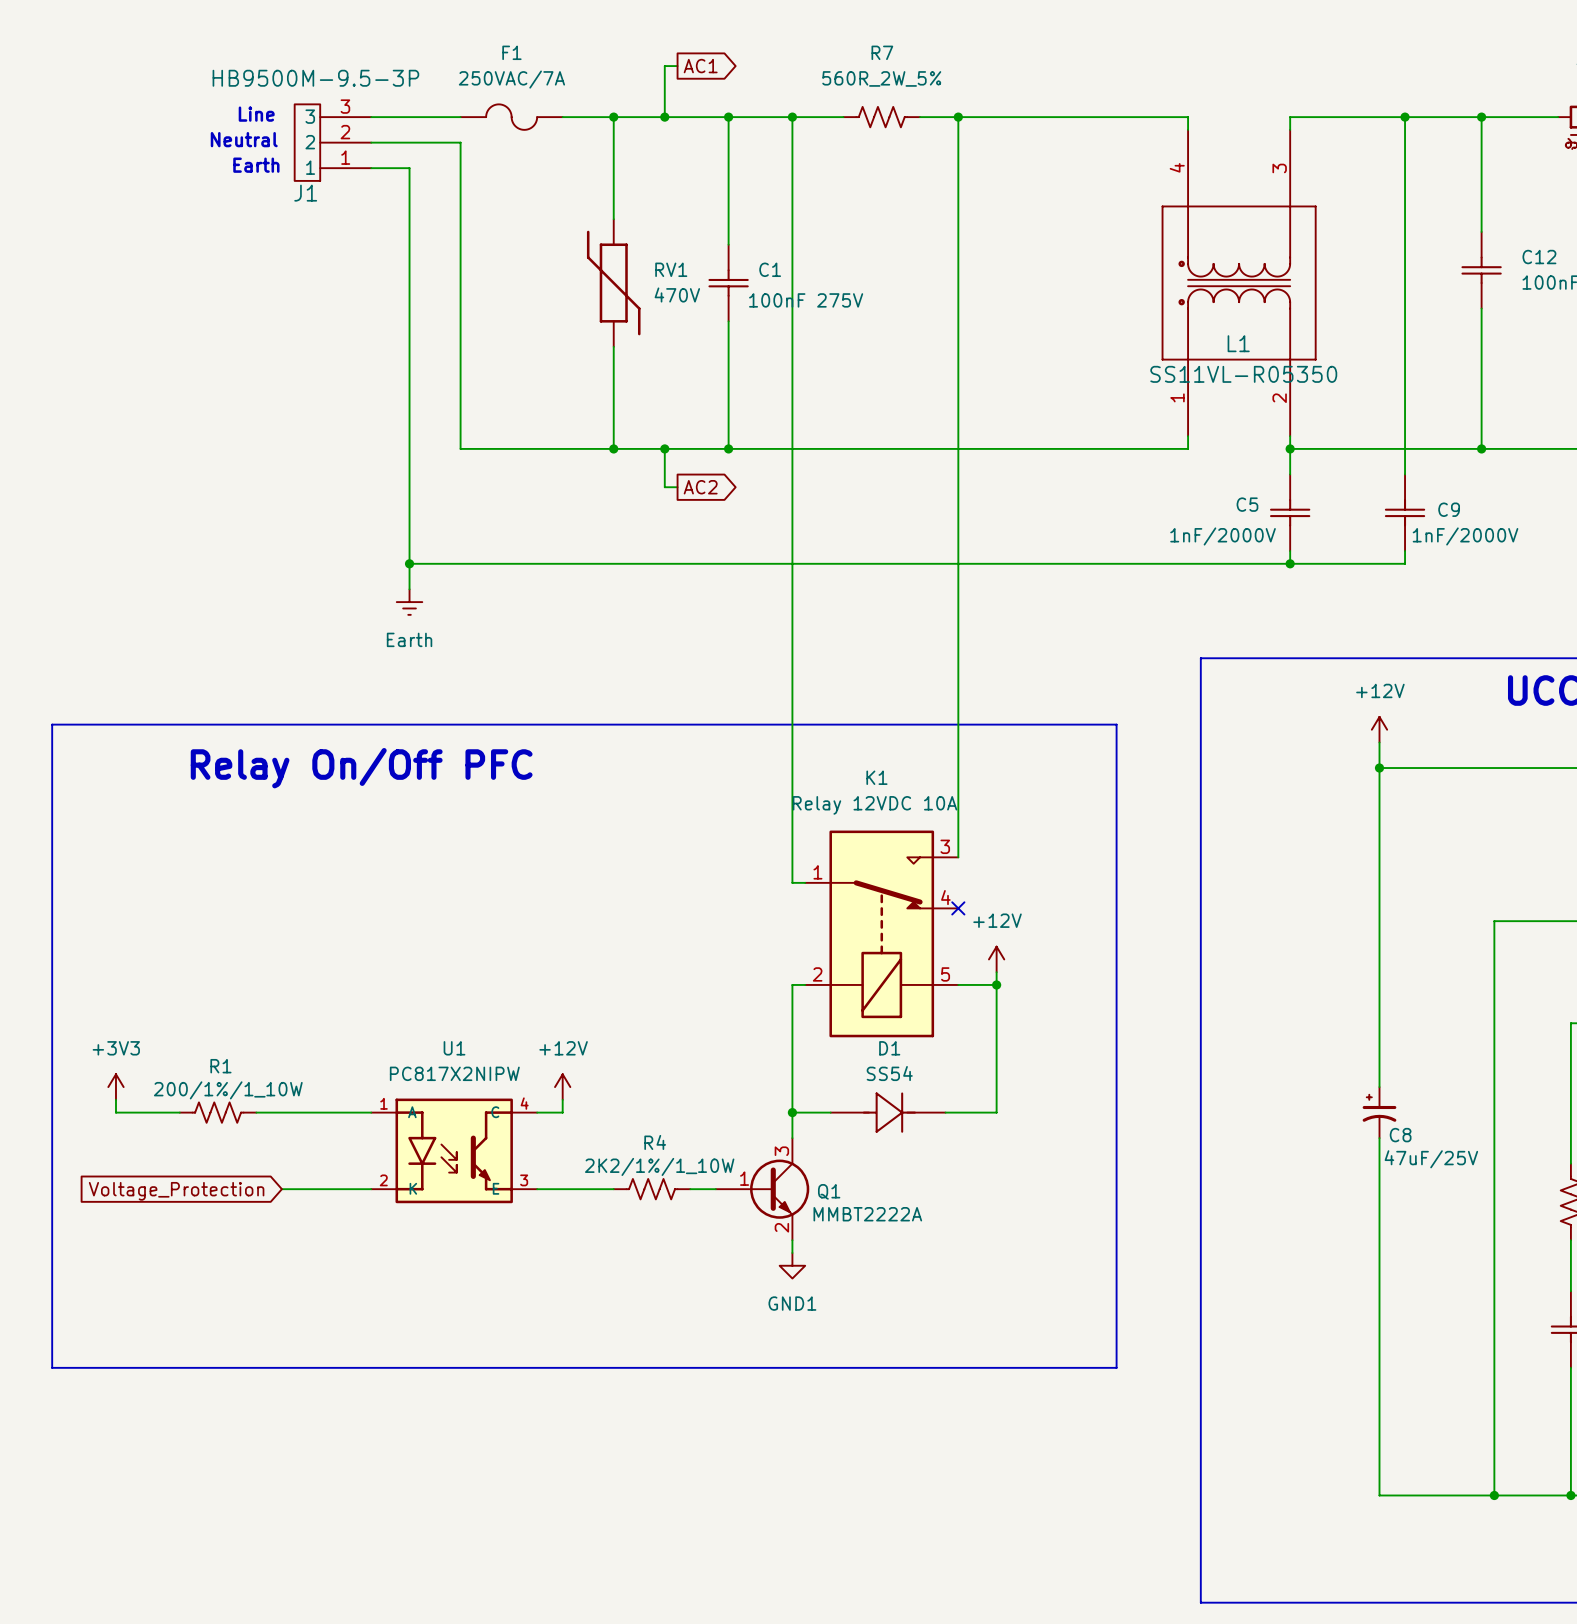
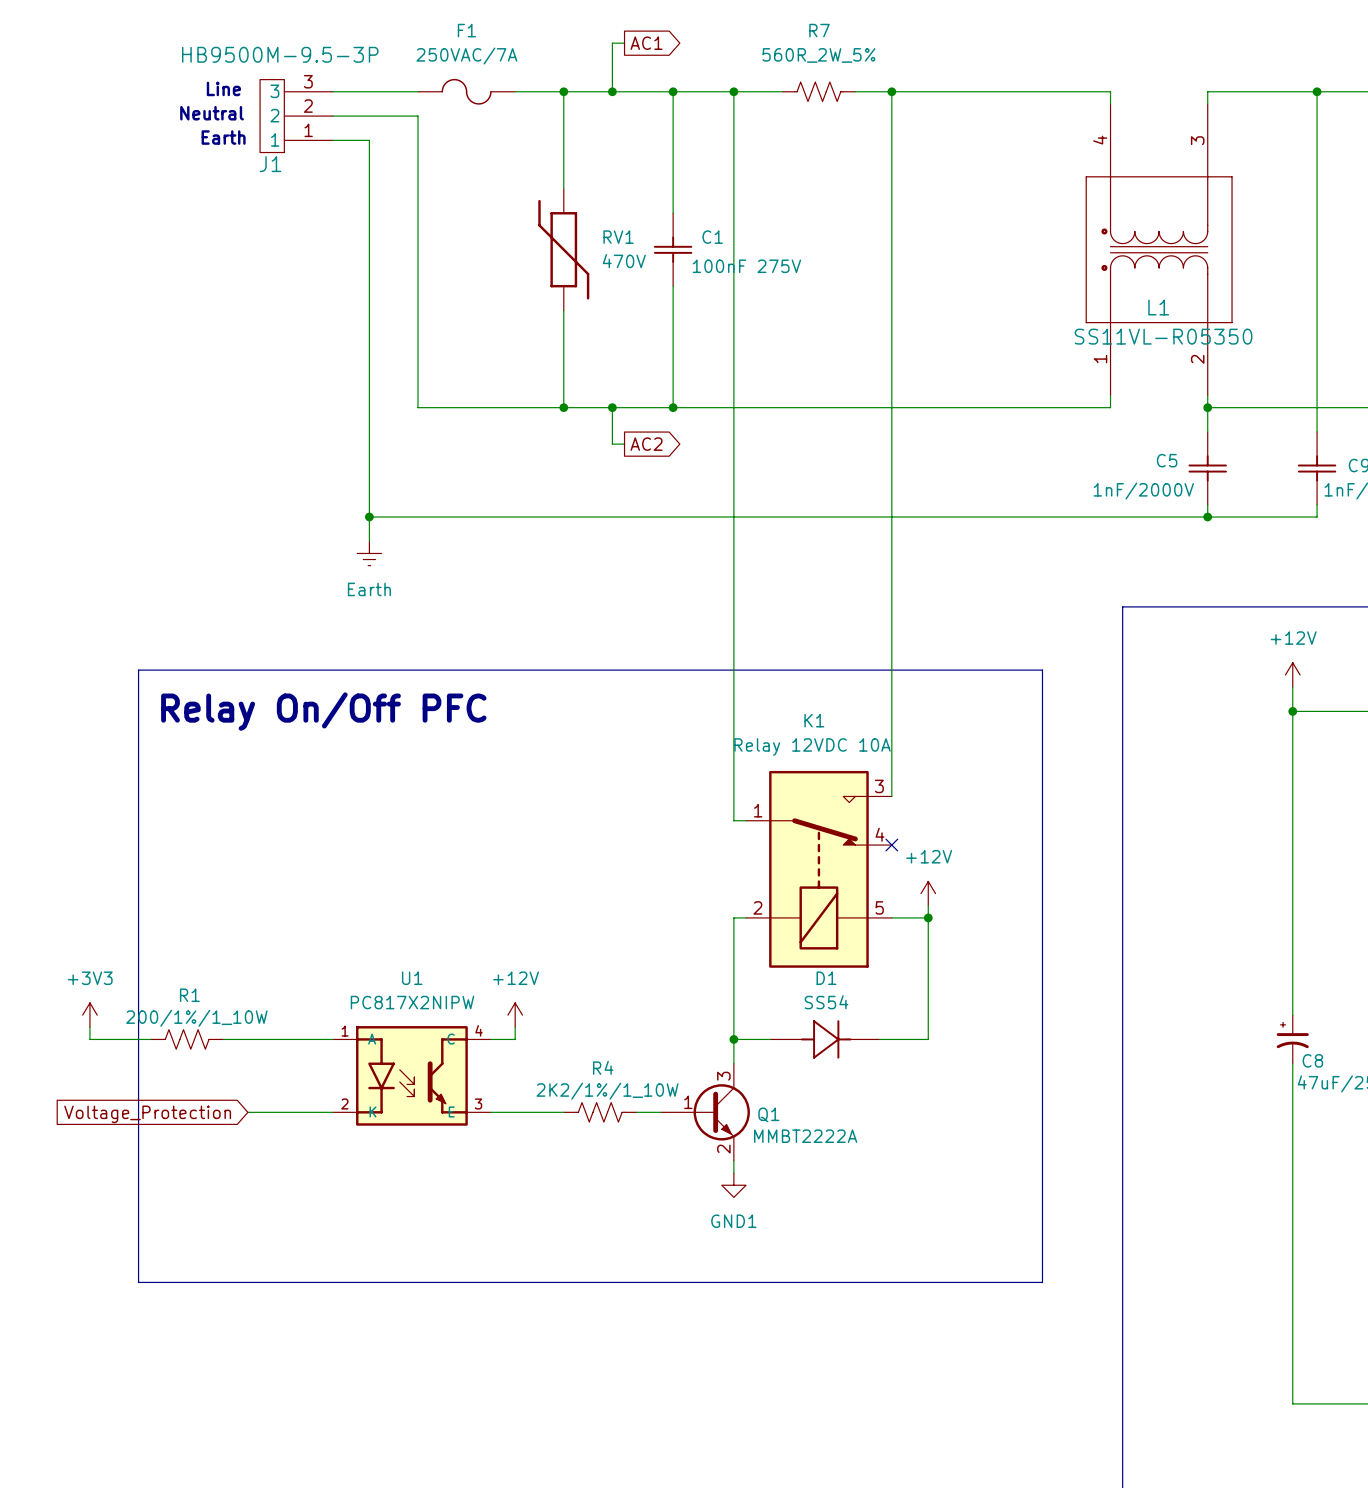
line: (167, 724) (52, 724) (52, 1367) (167, 1367) -> (138, 670) (138, 1282)

